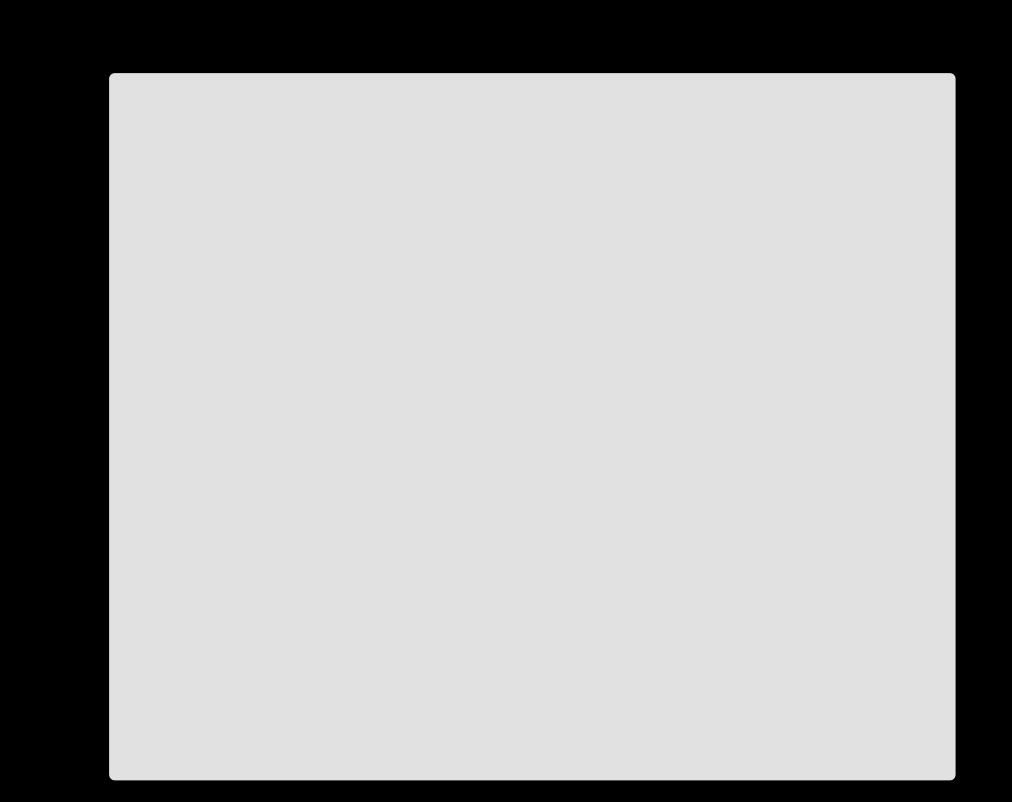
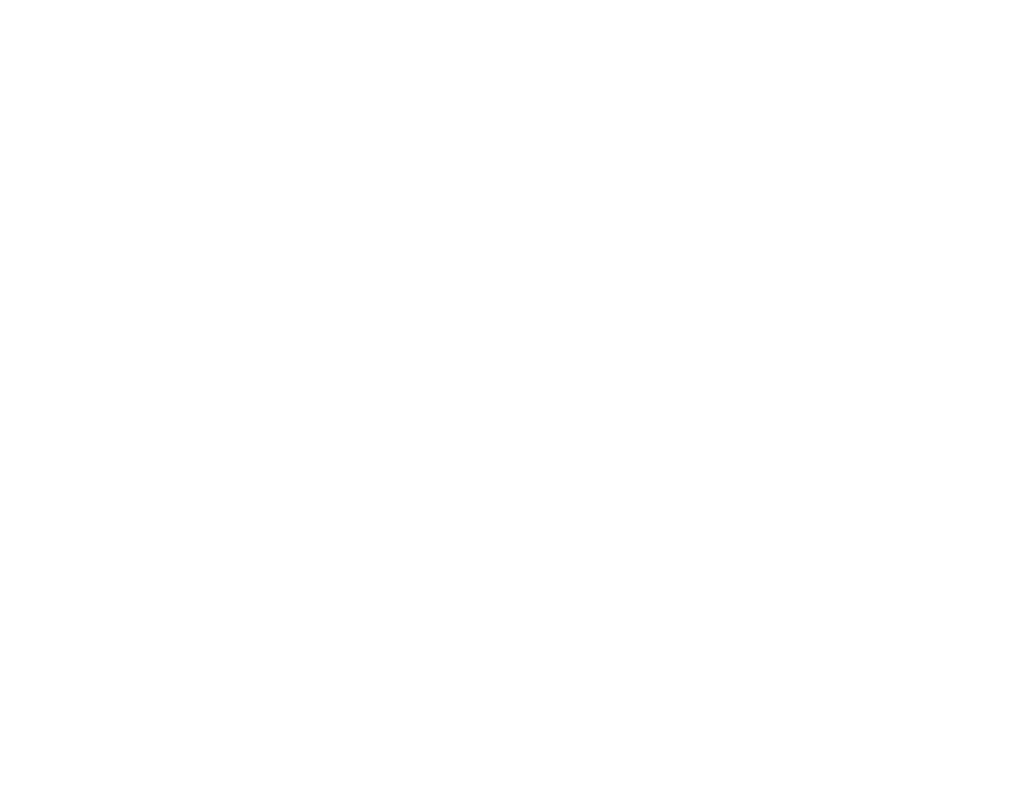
drawing: [109, 73, 956, 781] -> none

